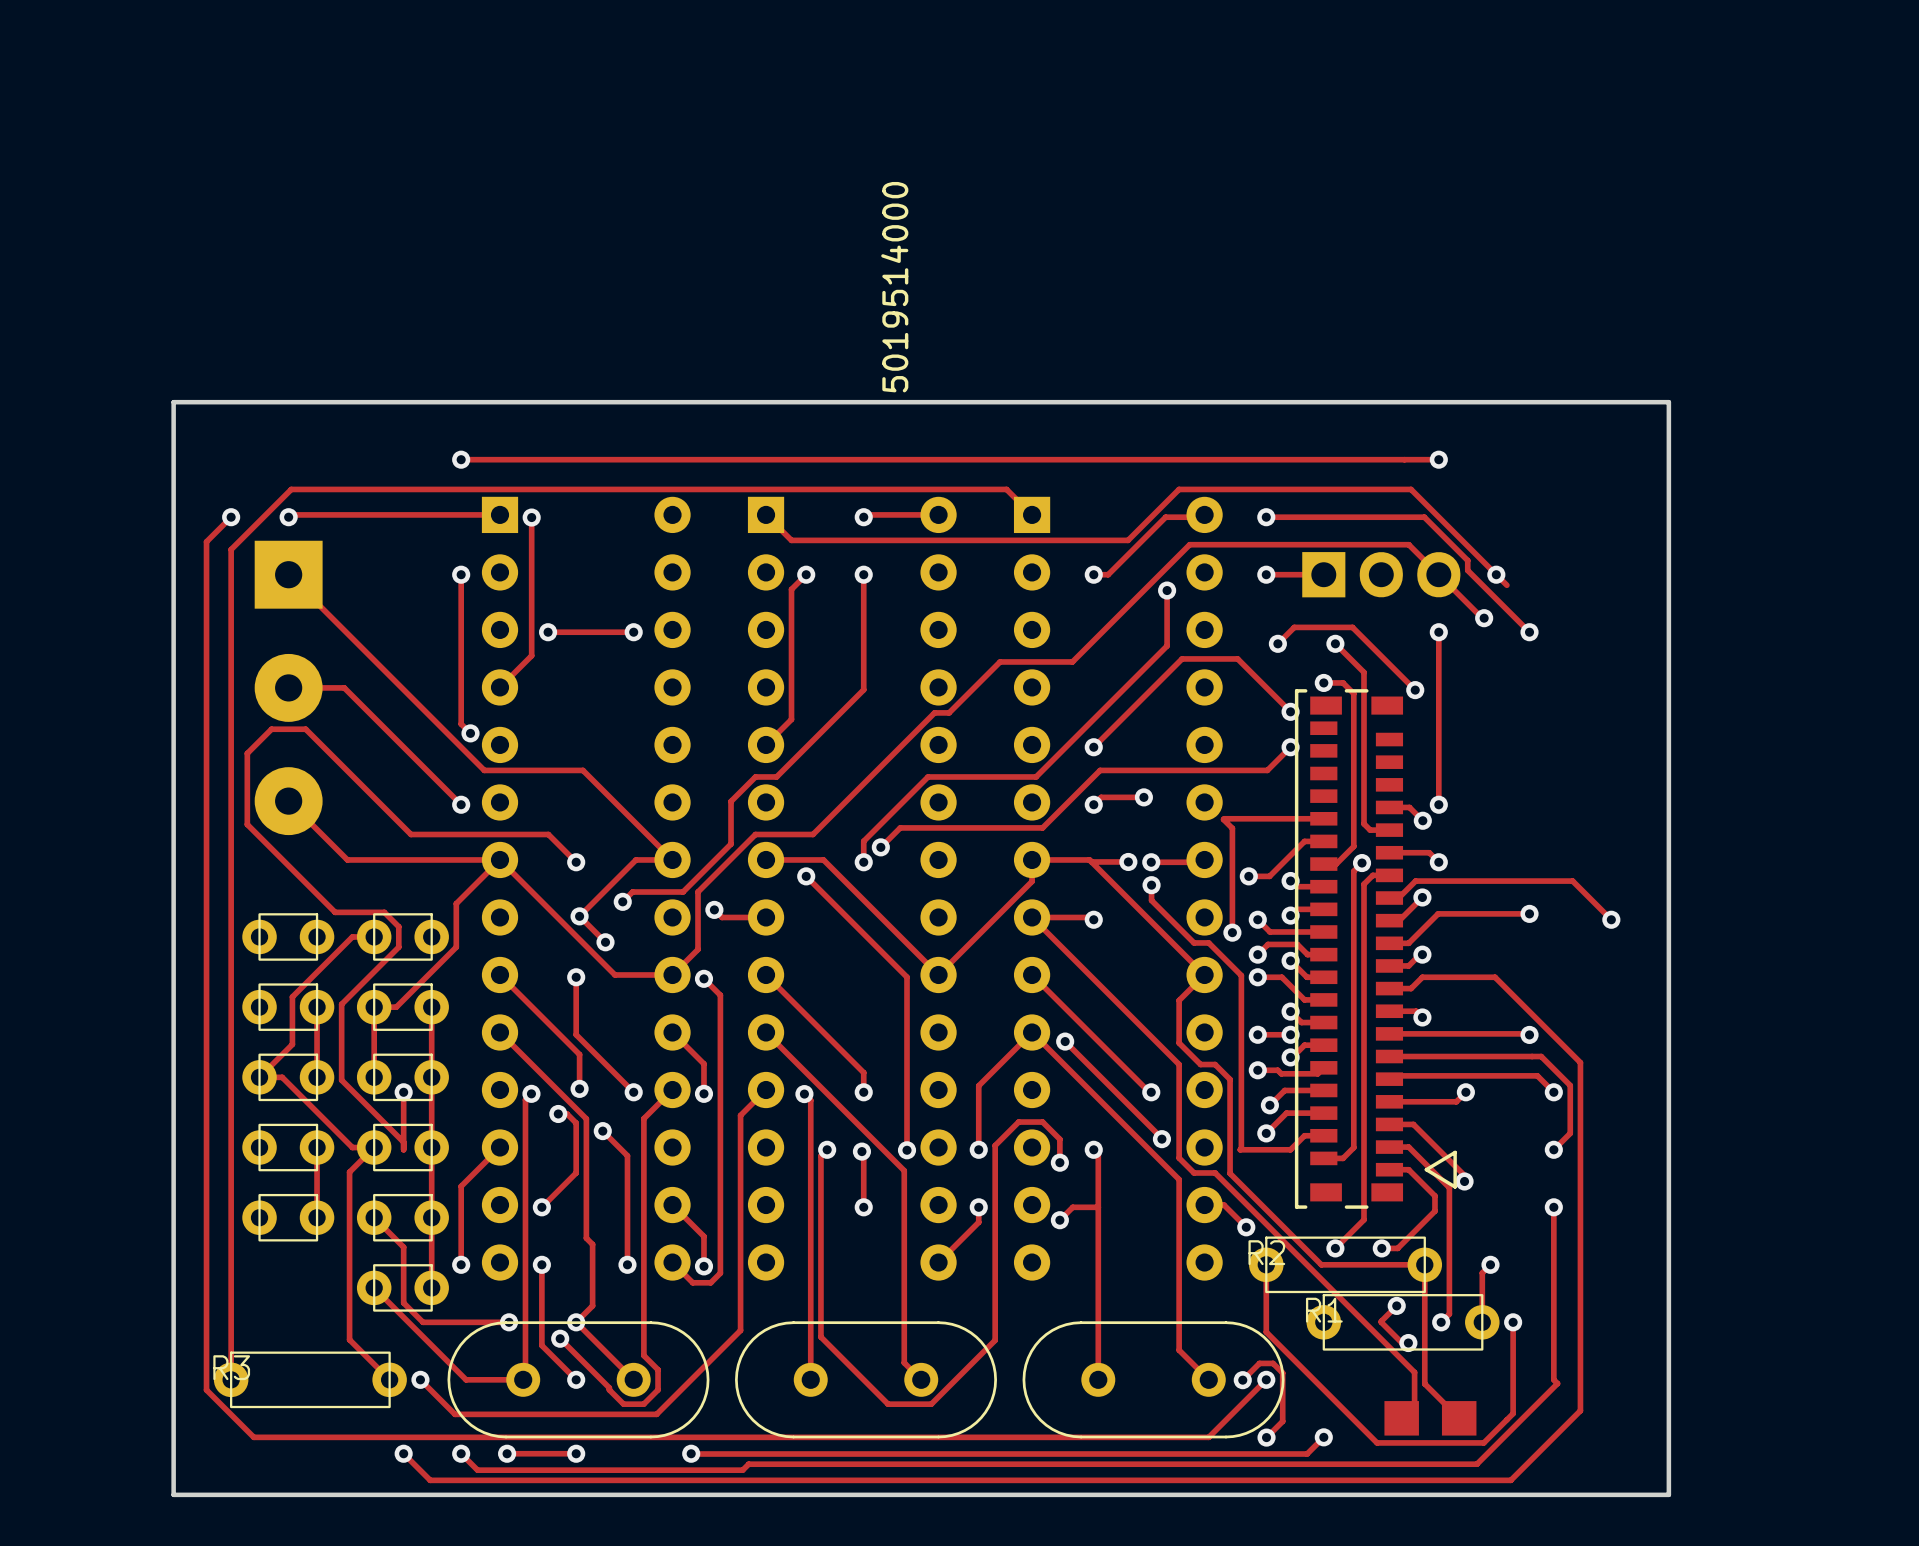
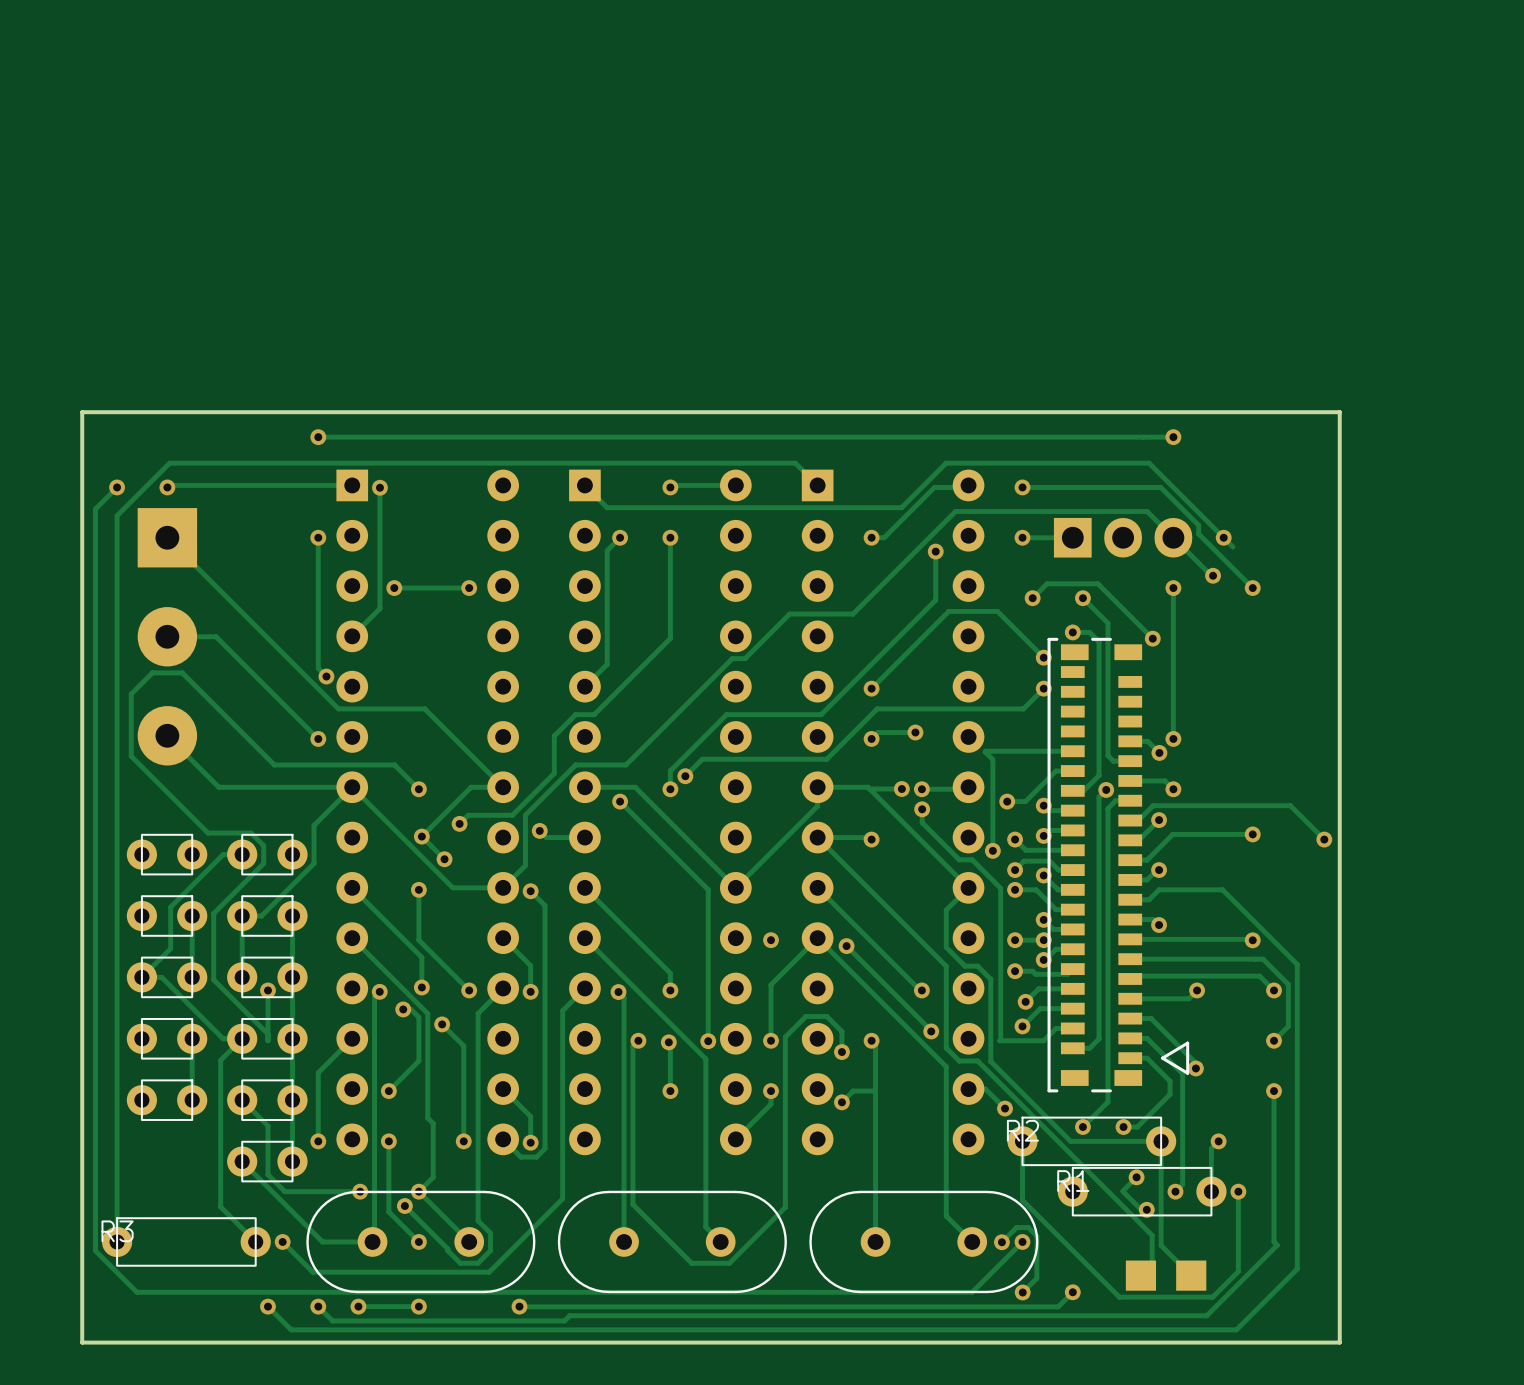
part text: 5019514000 (894, 287) -> none
via: none -> (771, 940)
board edge: (191, 1494) (173, 1494) (173, 402) (1668, 402) (1668, 1494) (1629, 1494) -> (82, 1342) (82, 412) (1339, 412) (1339, 1342)

